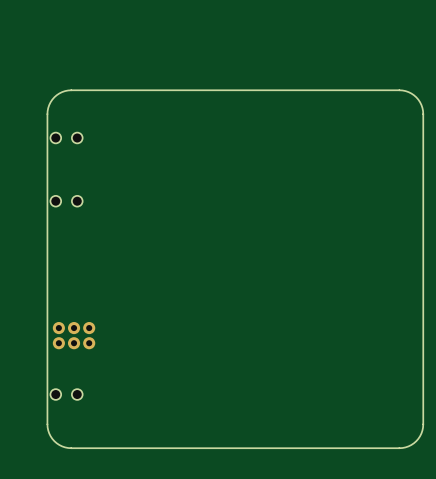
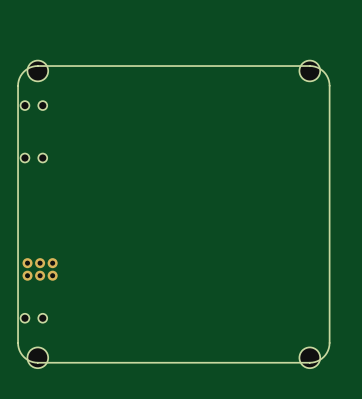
hole: none -> (37, 70)
hole: none -> (309, 70)
hole: none -> (37, 357)
hole: none -> (309, 357)

